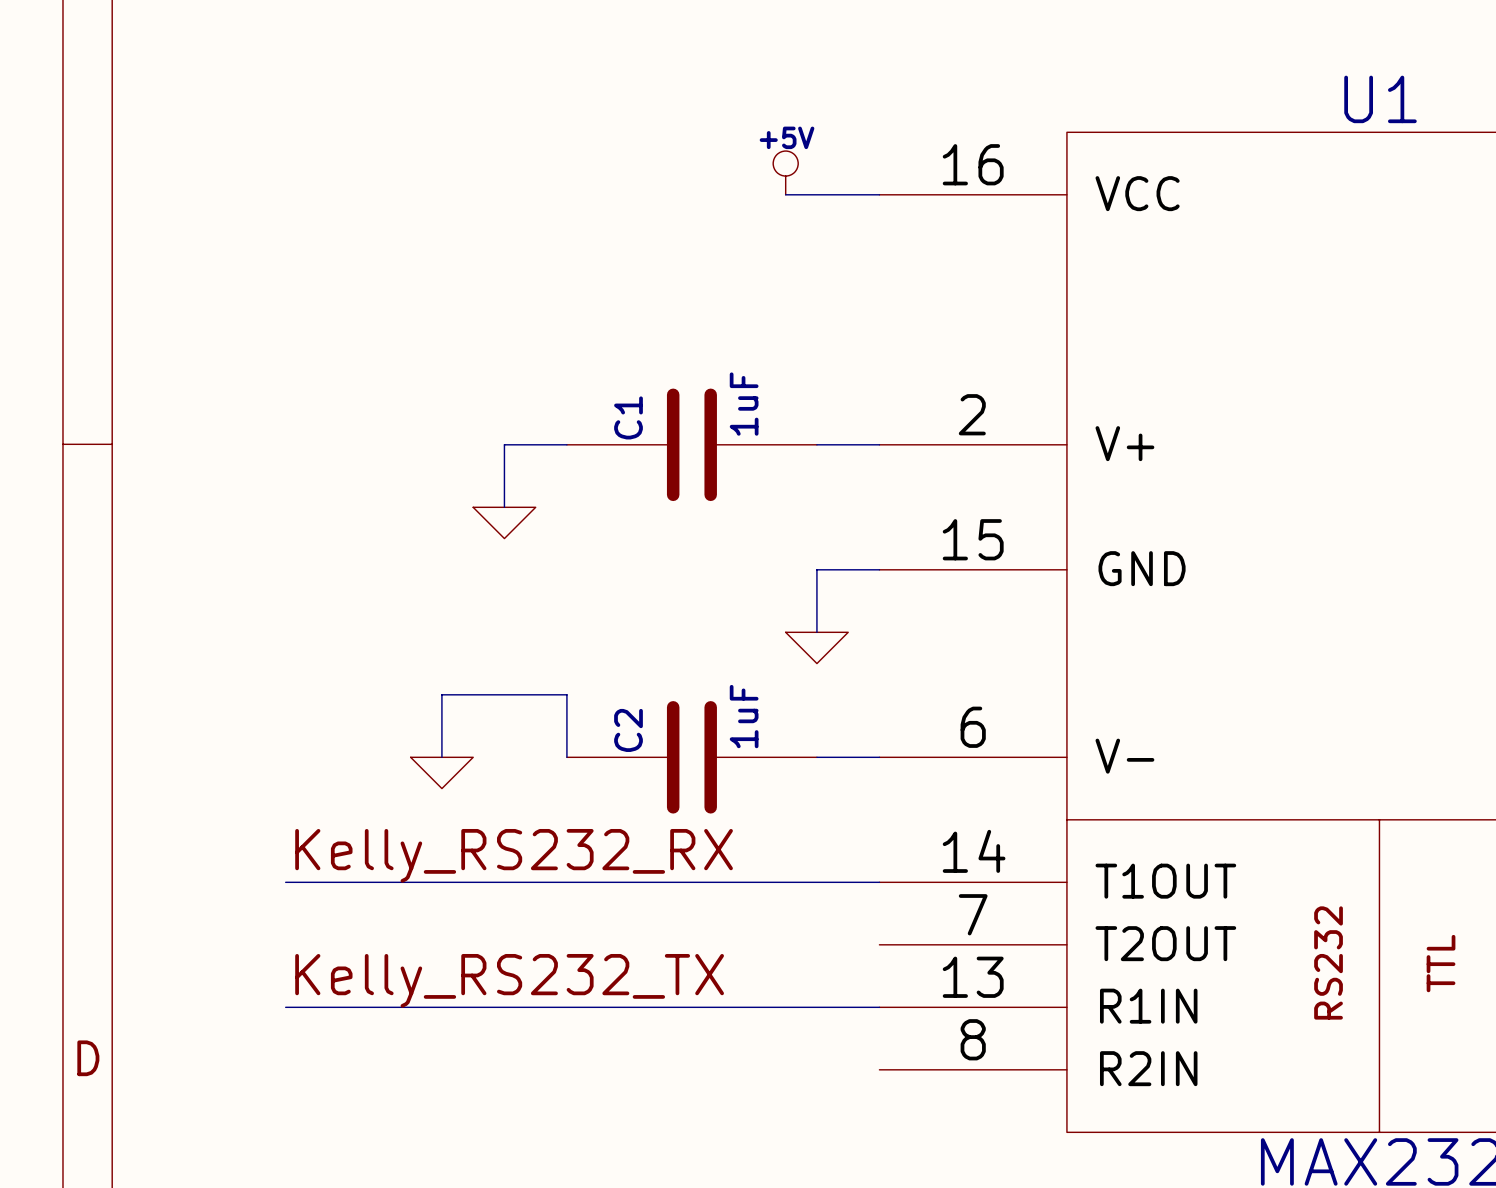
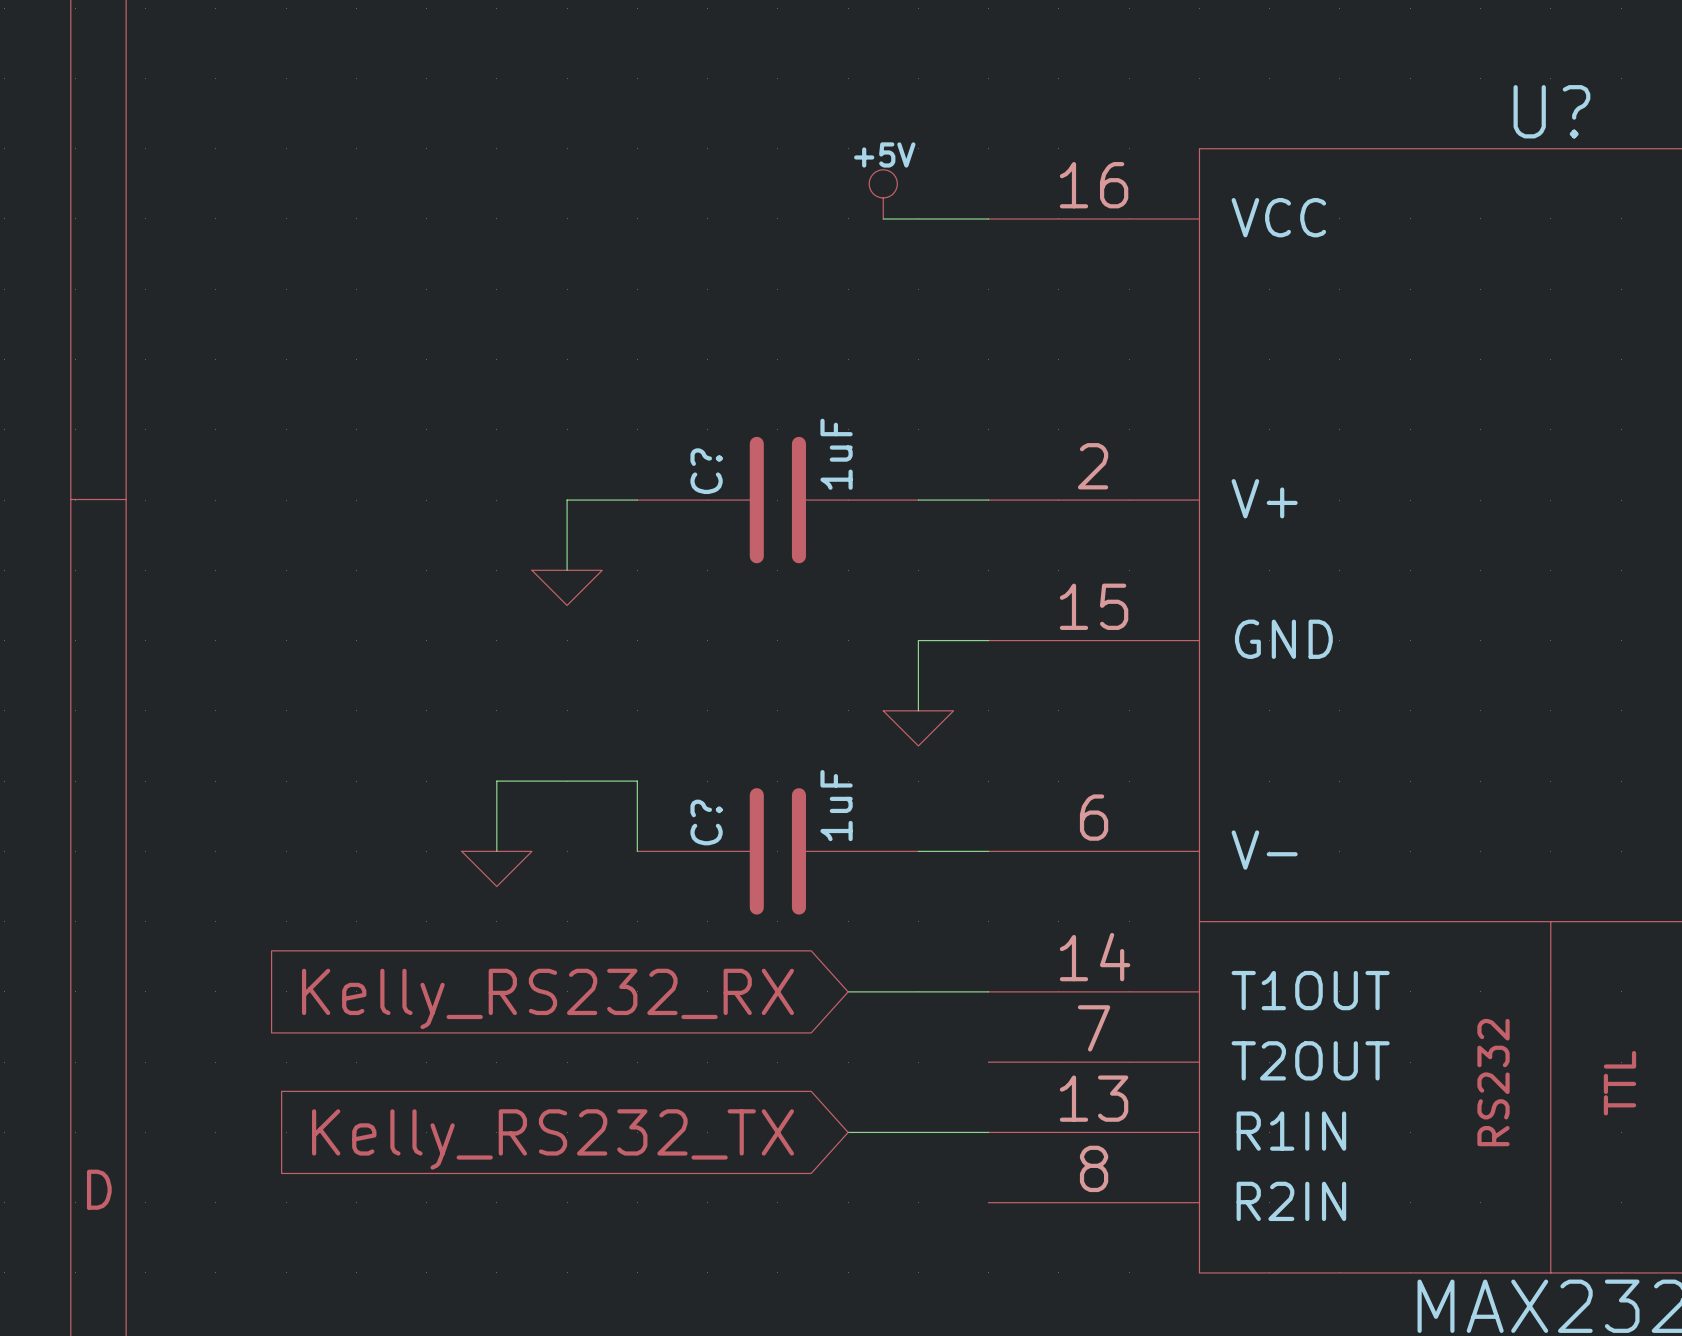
U1 name: U1 (1380, 99) -> U? (1551, 111)
C1 name: C1 (628, 417) -> C? (706, 471)
C2 name: C2 (628, 730) -> C? (706, 822)
label: Kelly_RS232_RX (514, 855) -> none
wire: (285, 882) (754, 882) -> none
global label: none -> Kelly_RS232_RX (547, 998)
label: Kelly_RS232_TX (509, 980) -> none
wire: (285, 1007) (754, 1007) -> none
global label: none -> Kelly_RS232_TX (553, 1139)

